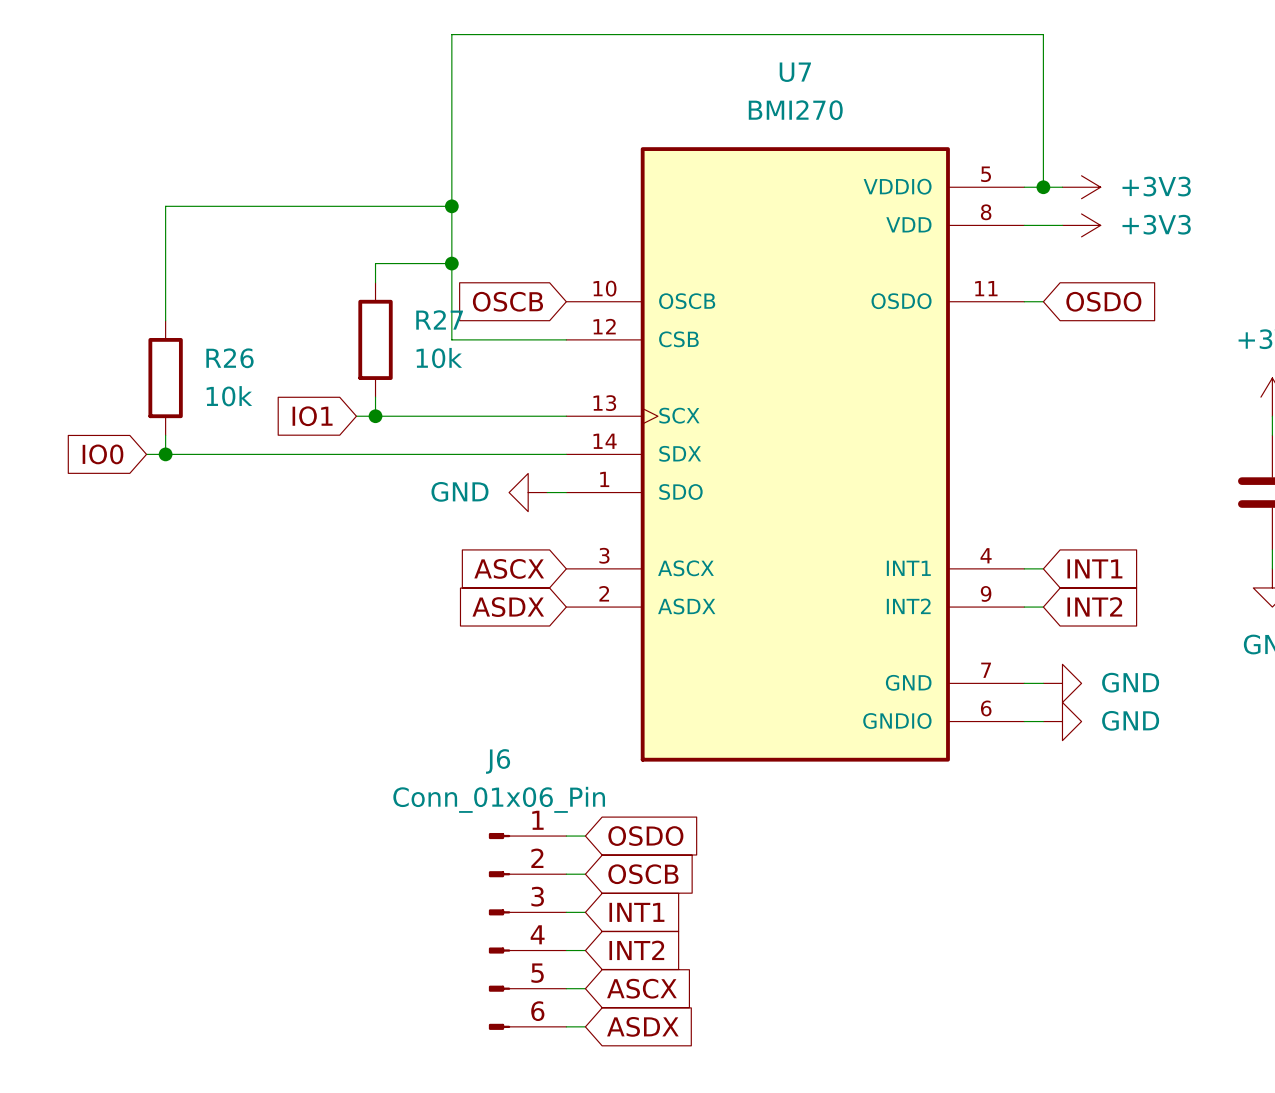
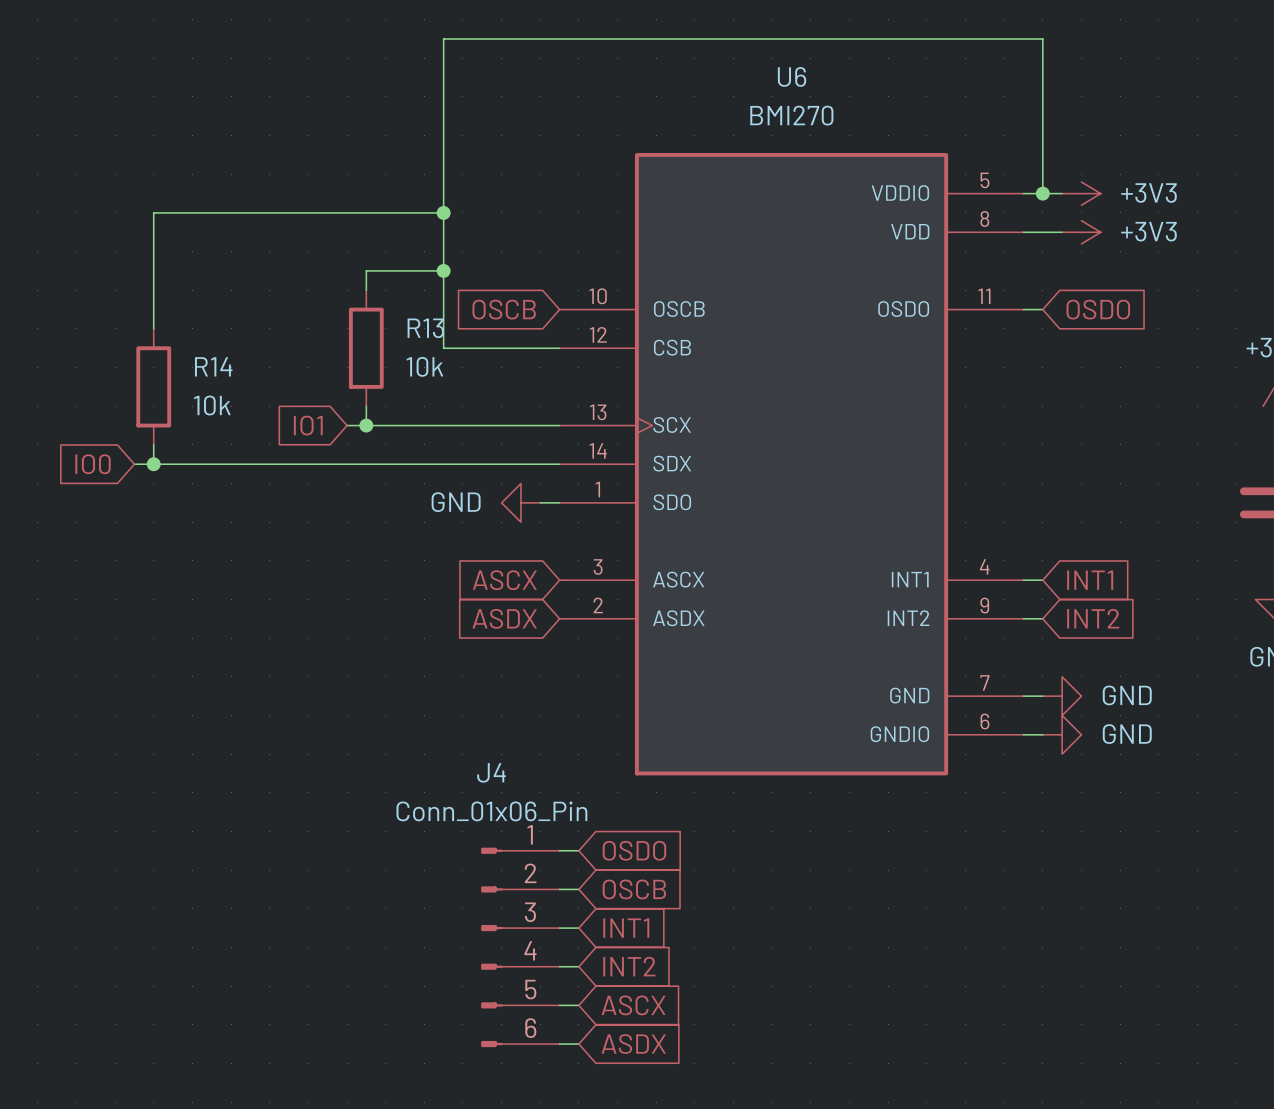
U7 name: U7 (795, 72) -> U6 (792, 76)
R27 name: R27 (439, 319) -> R13 (425, 328)
R26 name: R26 (229, 358) -> R14 (213, 366)
J6 name: J6 (498, 761) -> J4 (491, 772)

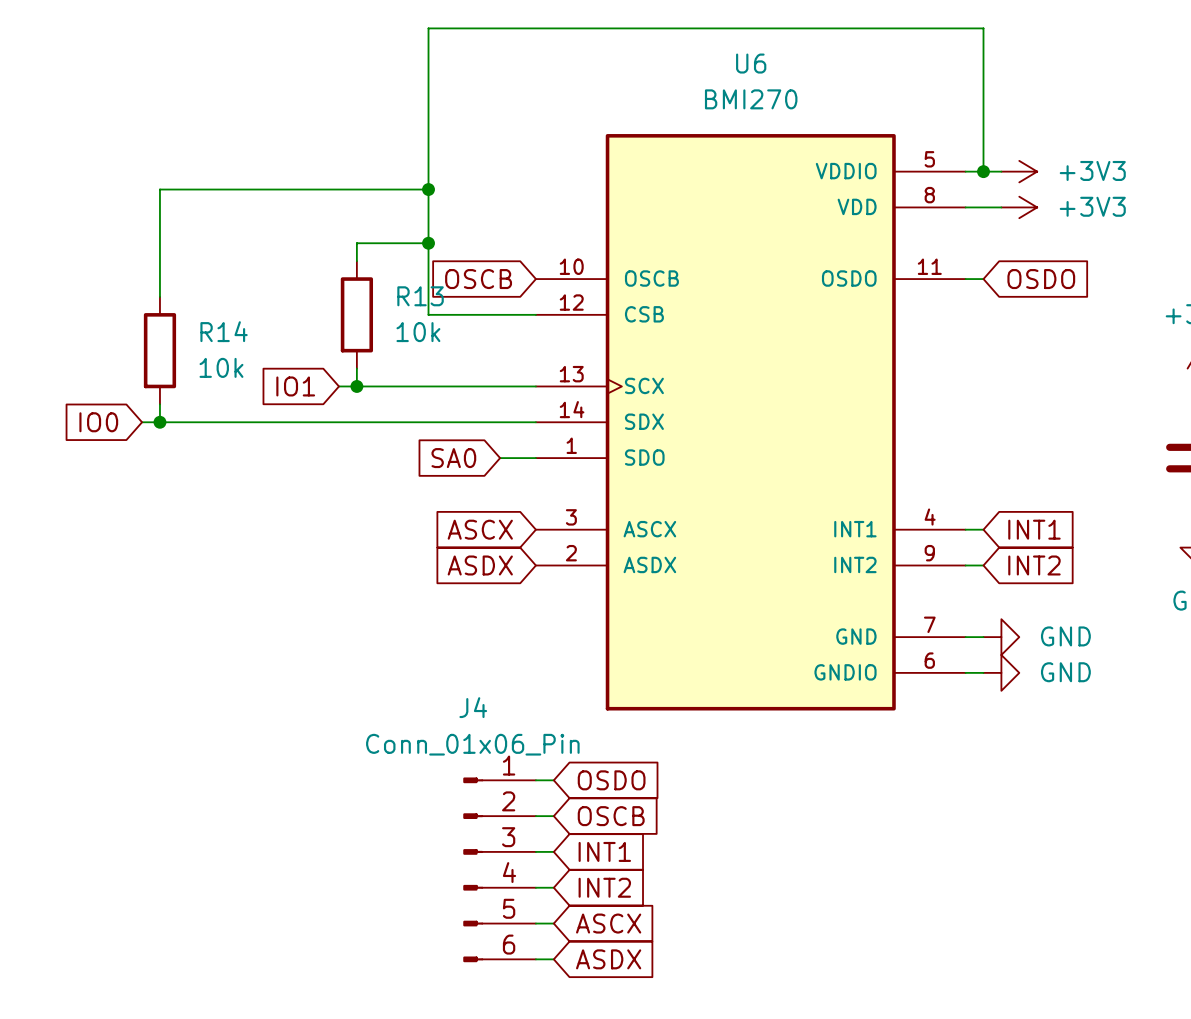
global label: none -> SA0 (453, 458)
power symbol: GND (520, 502) -> none

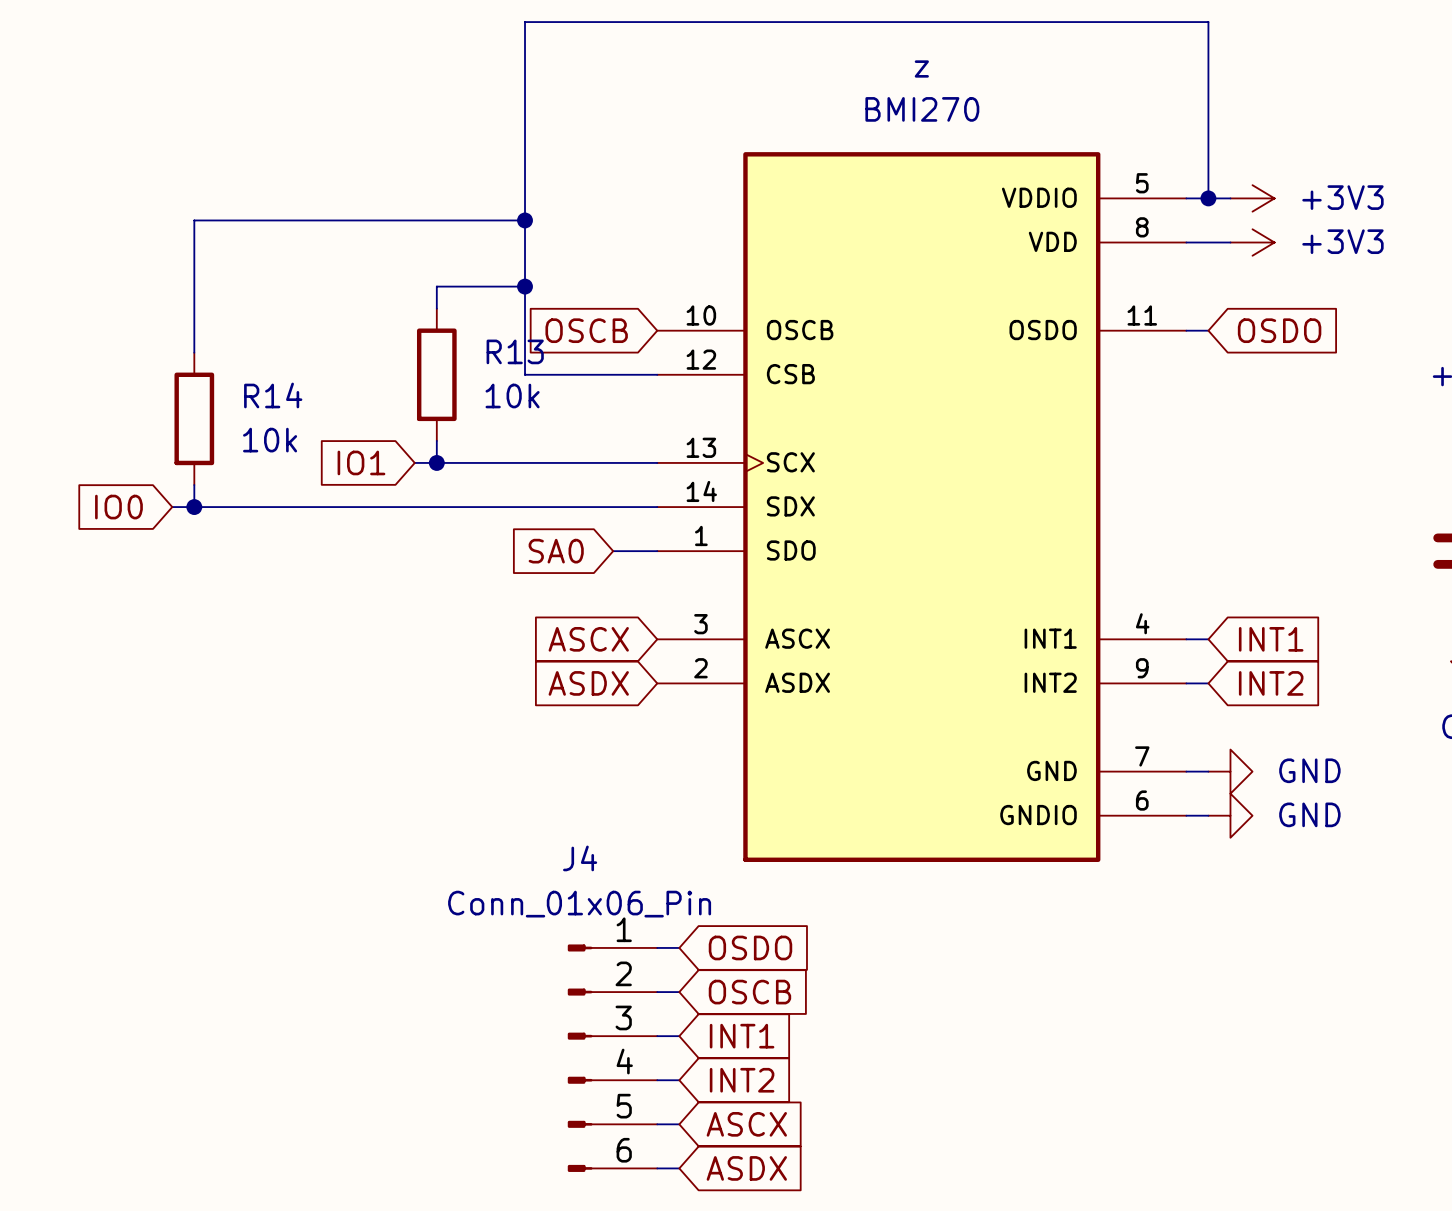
U6 name: U6 (751, 63) -> z (921, 68)

